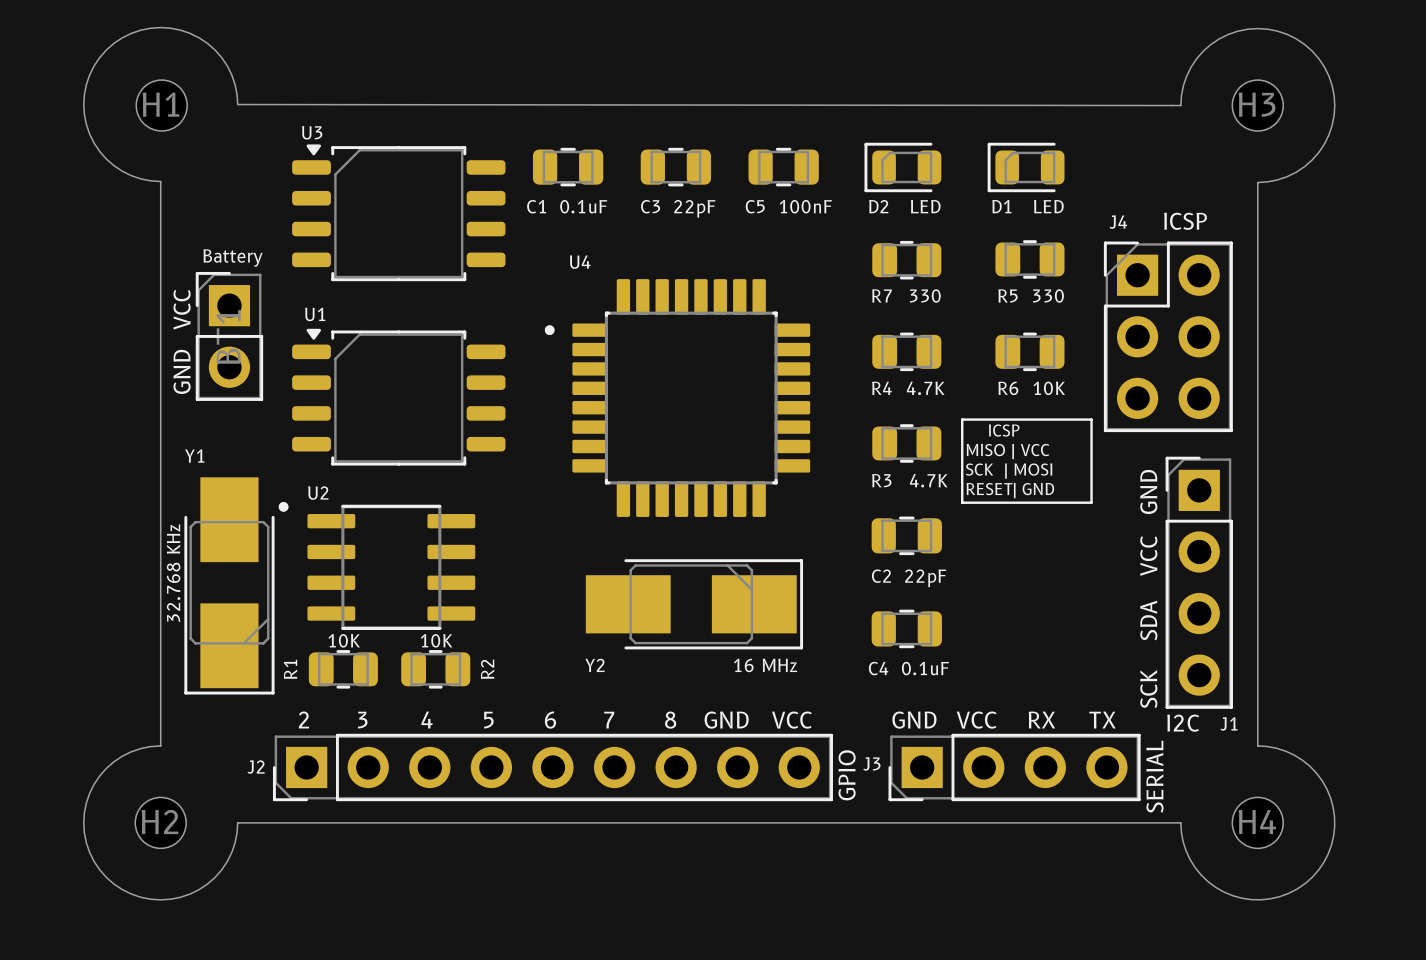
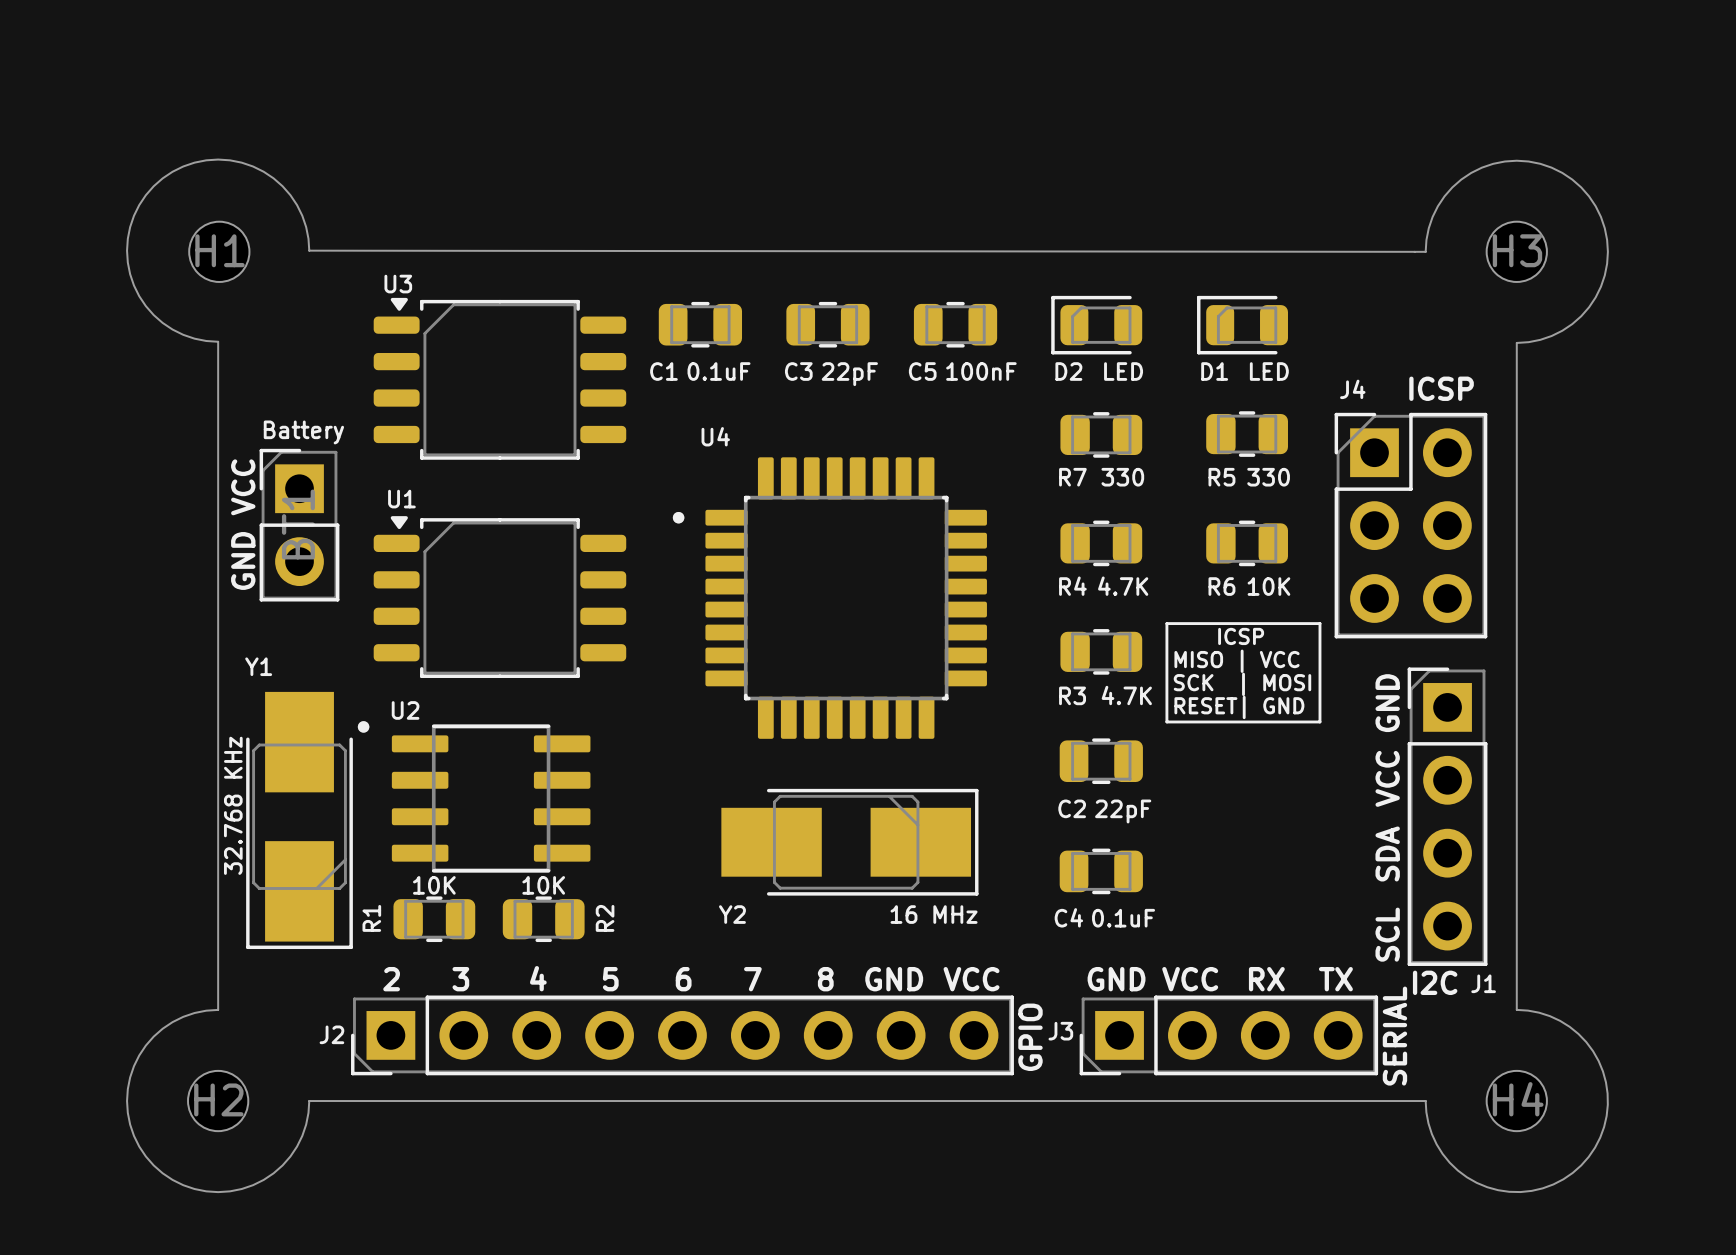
text: SCK (1148, 689) -> SCL (1387, 934)

